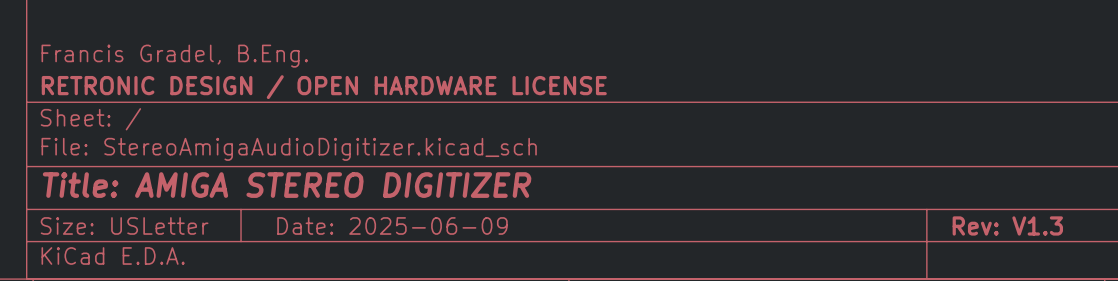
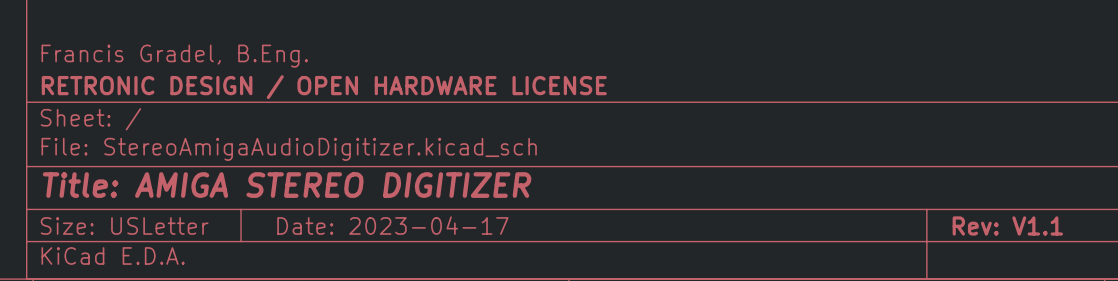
title block: Date: 2025-06-09 (392, 225) -> Date: 2023-04-17 (392, 225)
title block: Rev: V1.3 (1007, 225) -> Rev: V1.1 (1007, 225)

